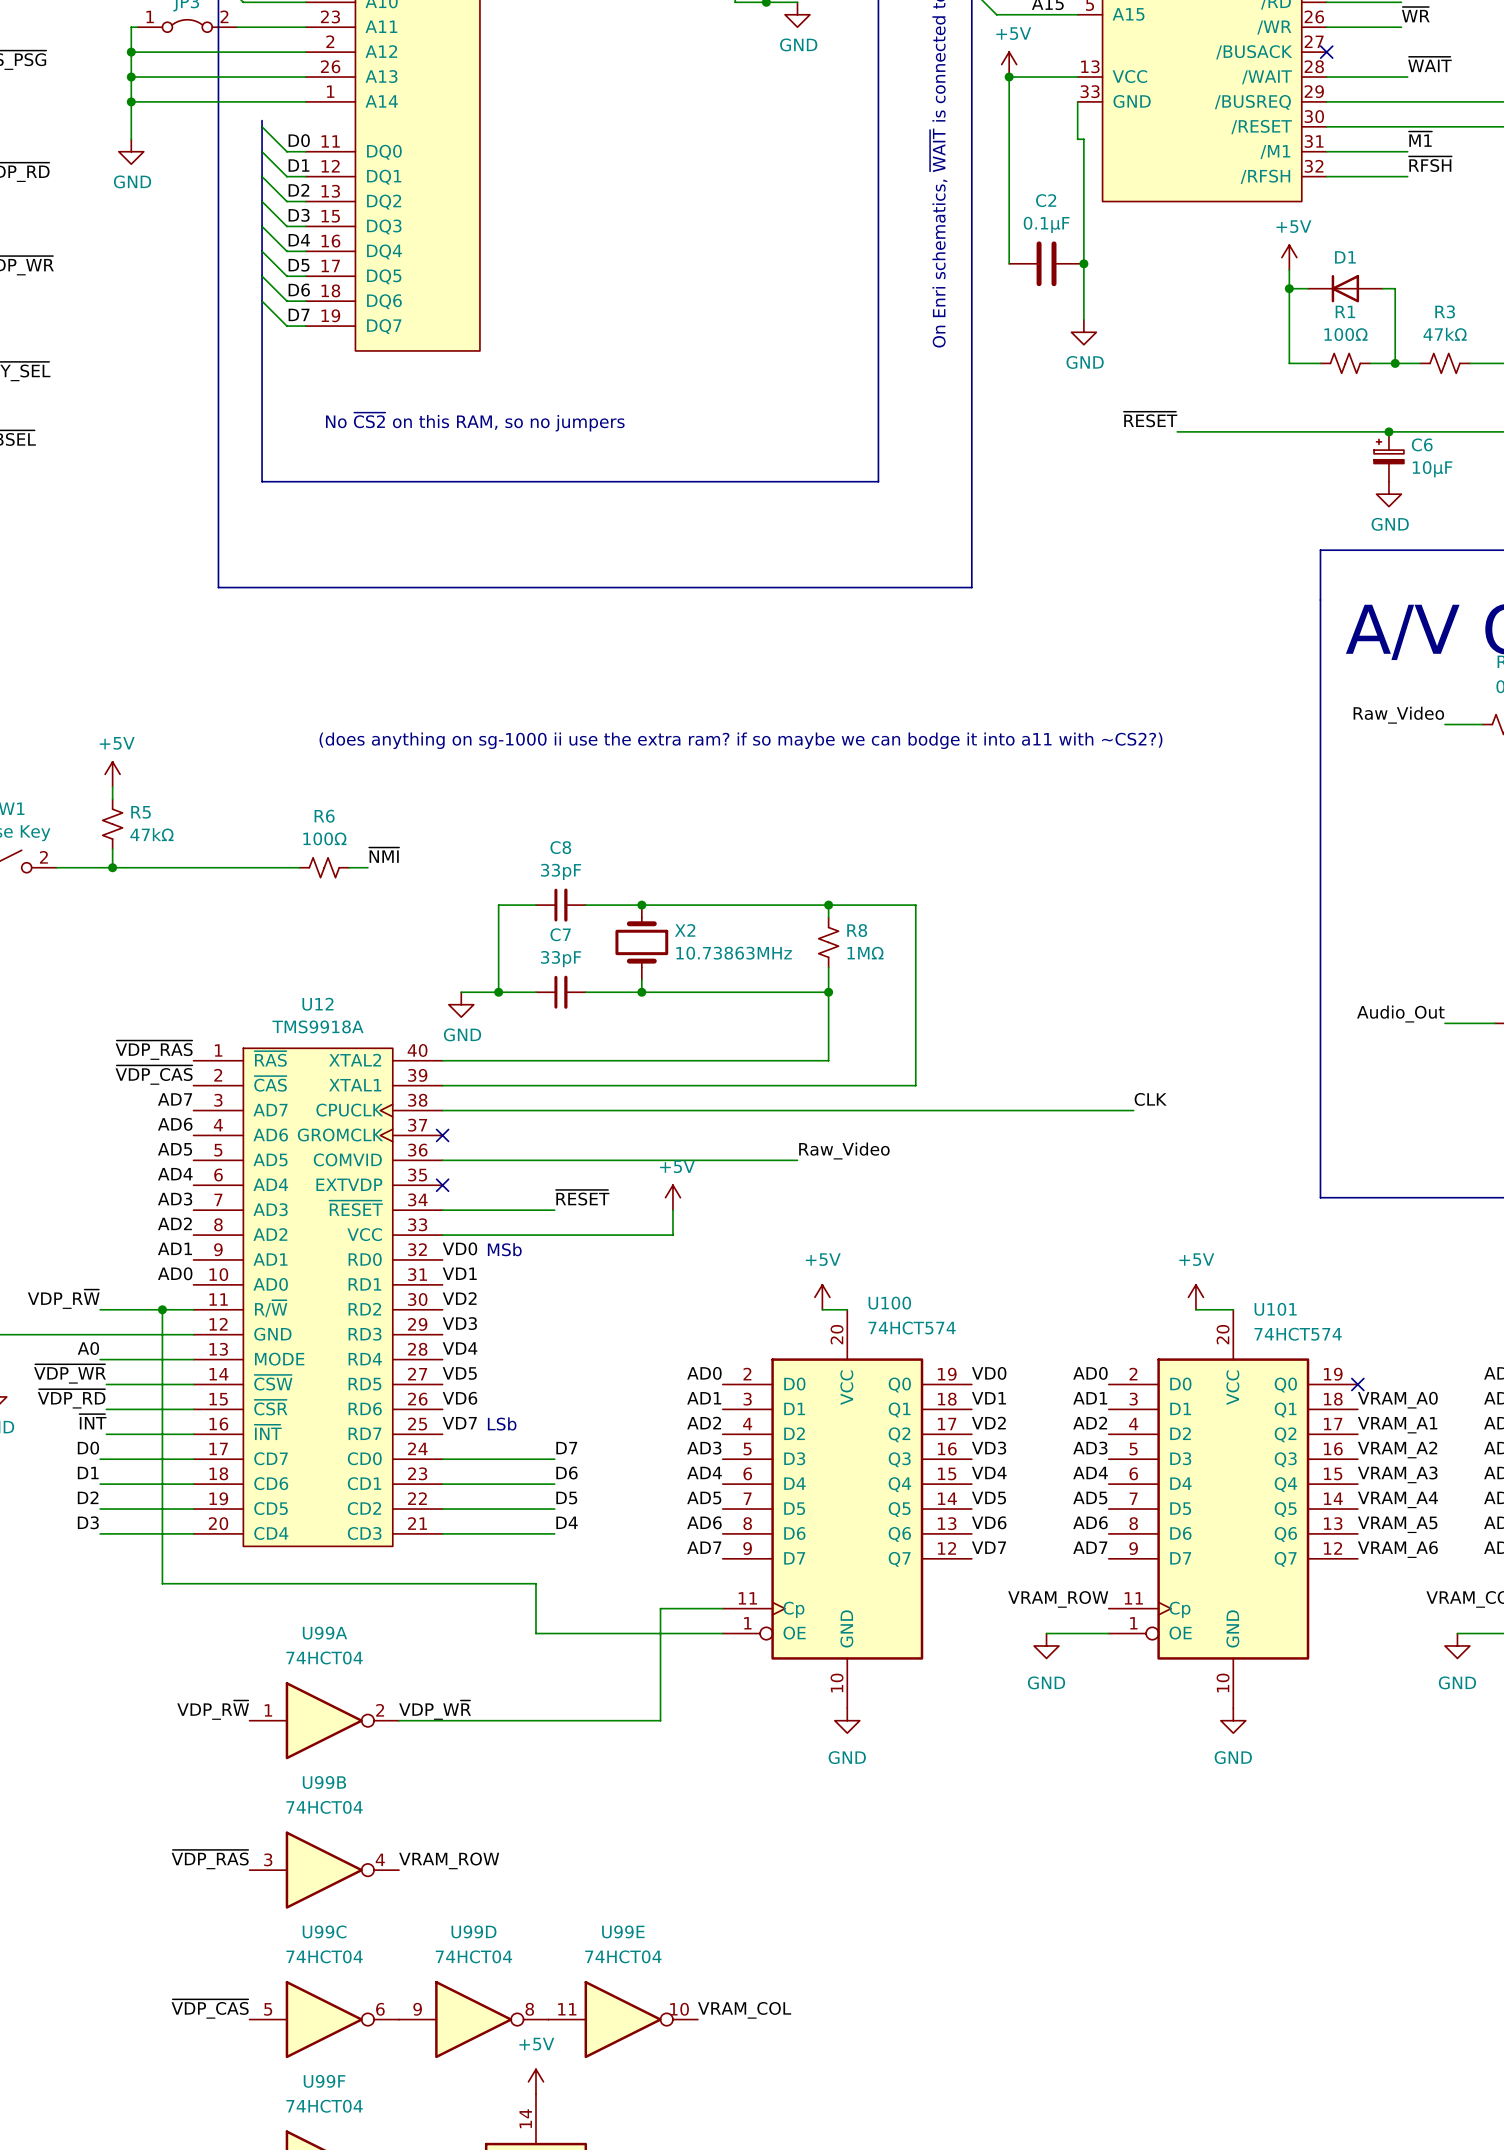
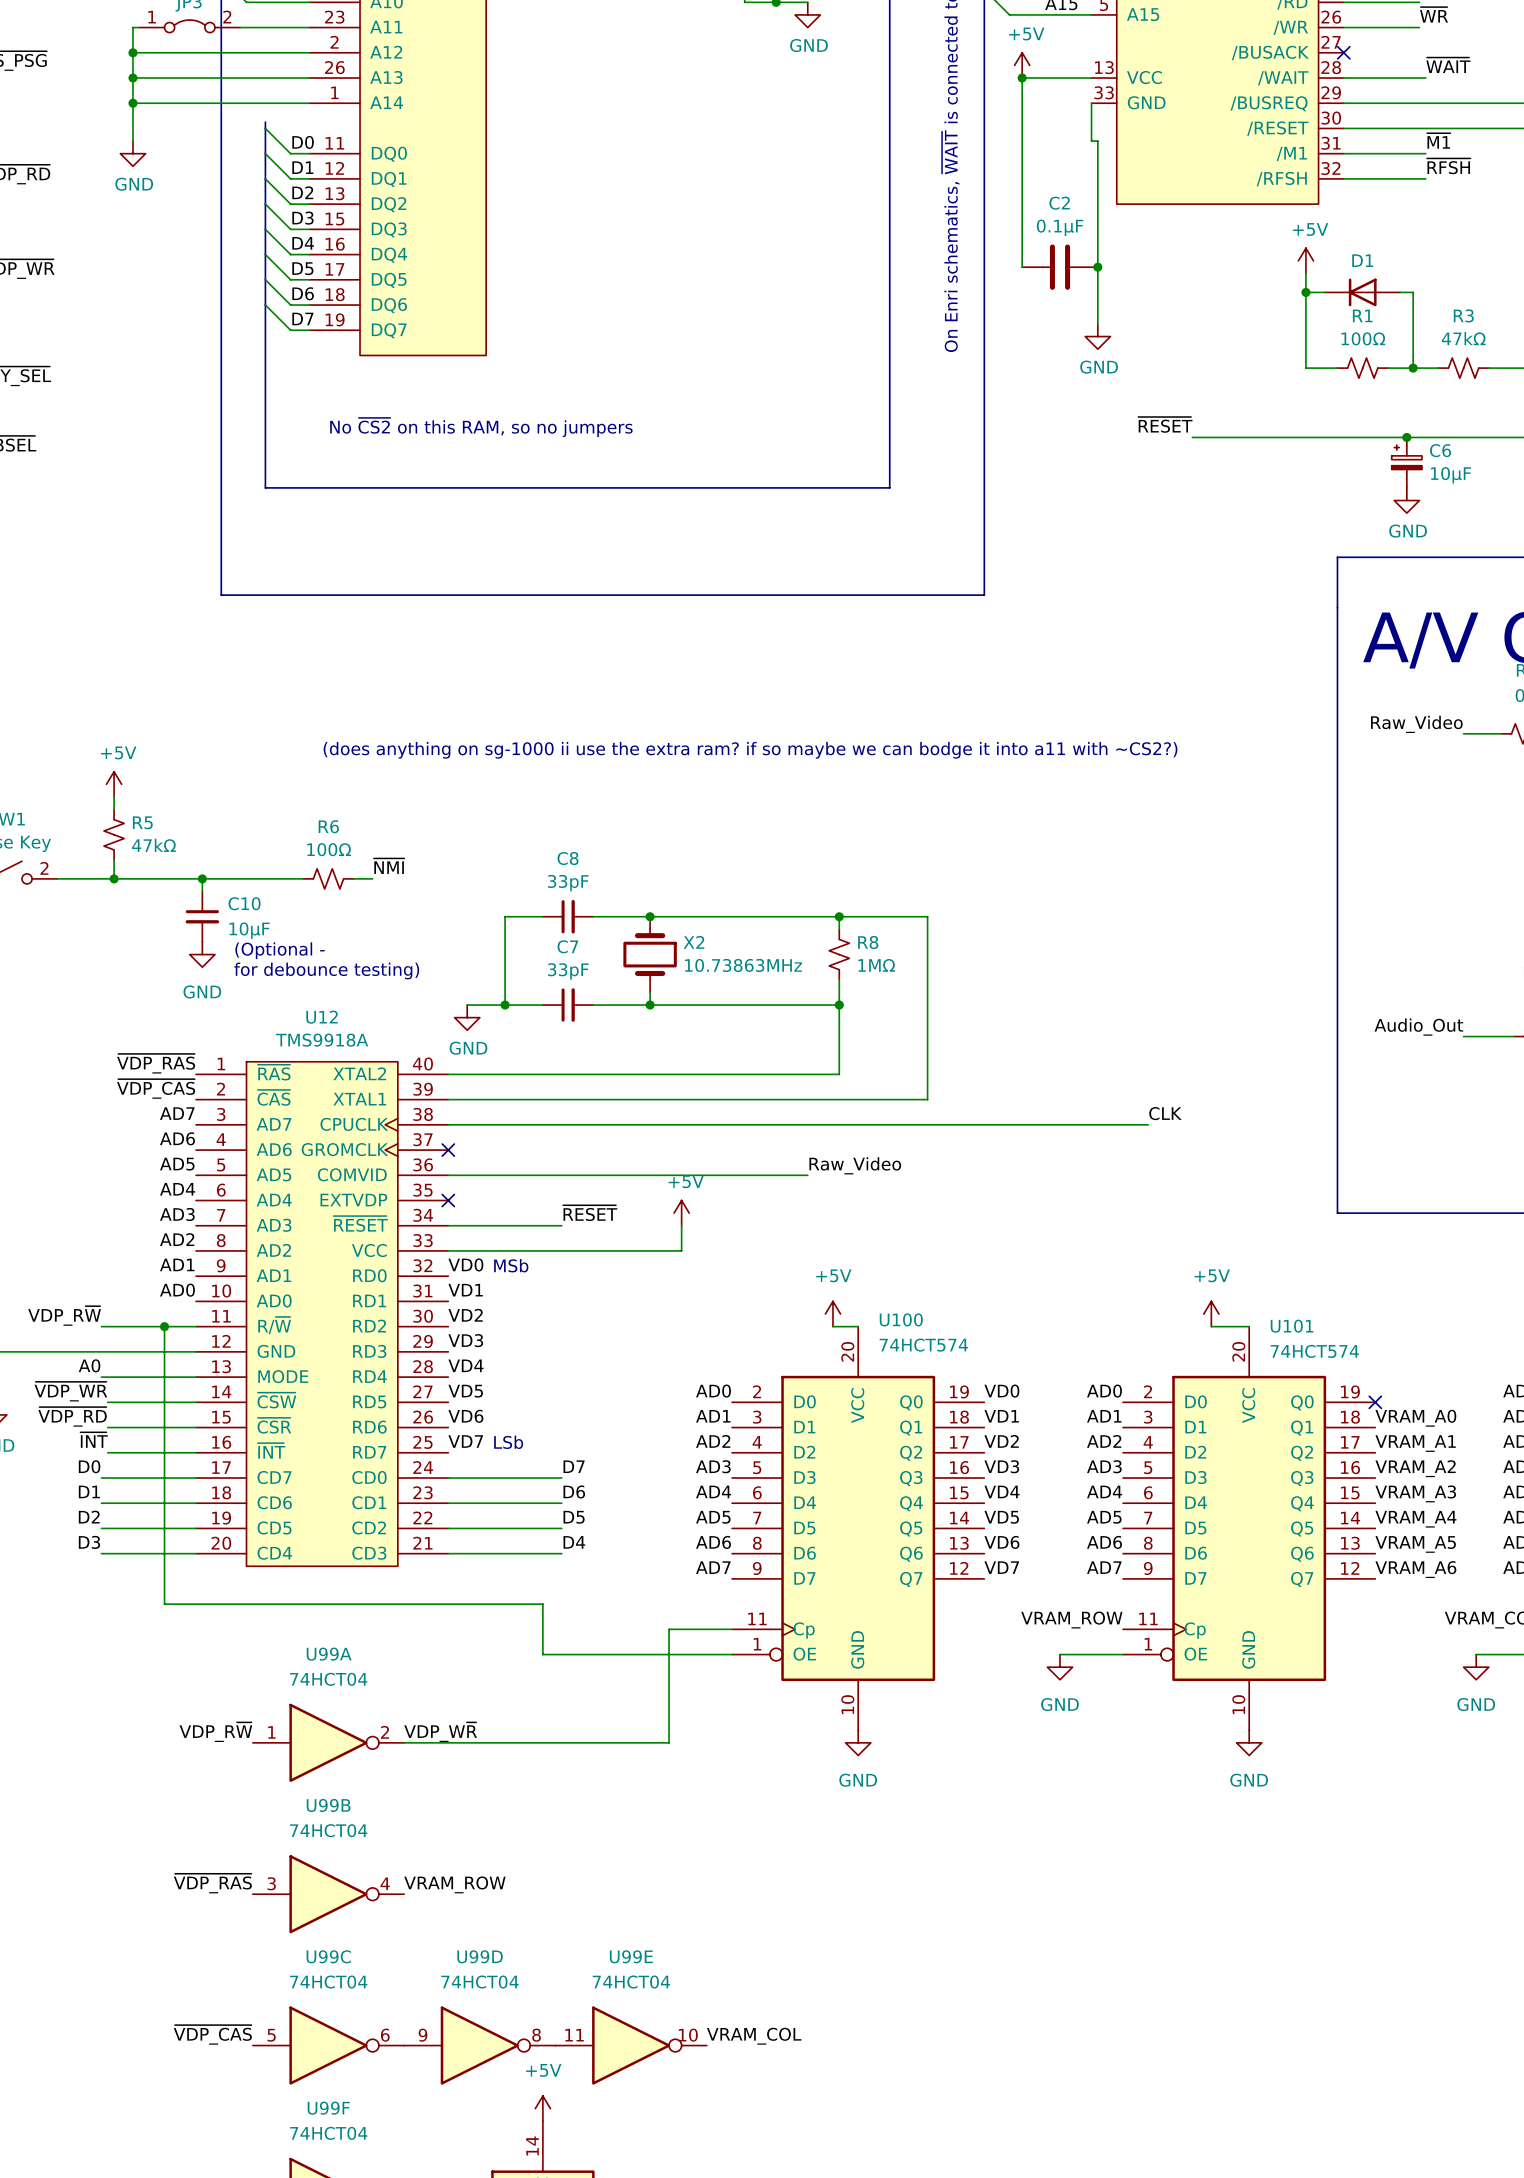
wire: none -> (202, 878) (202, 891)
junction: none -> (202, 878)
C10: none -> 10µF (202, 916)
text: none -> (Optional - (280, 950)
power symbol: none -> GND (202, 954)
text: none -> for debounce testing) (326, 971)

